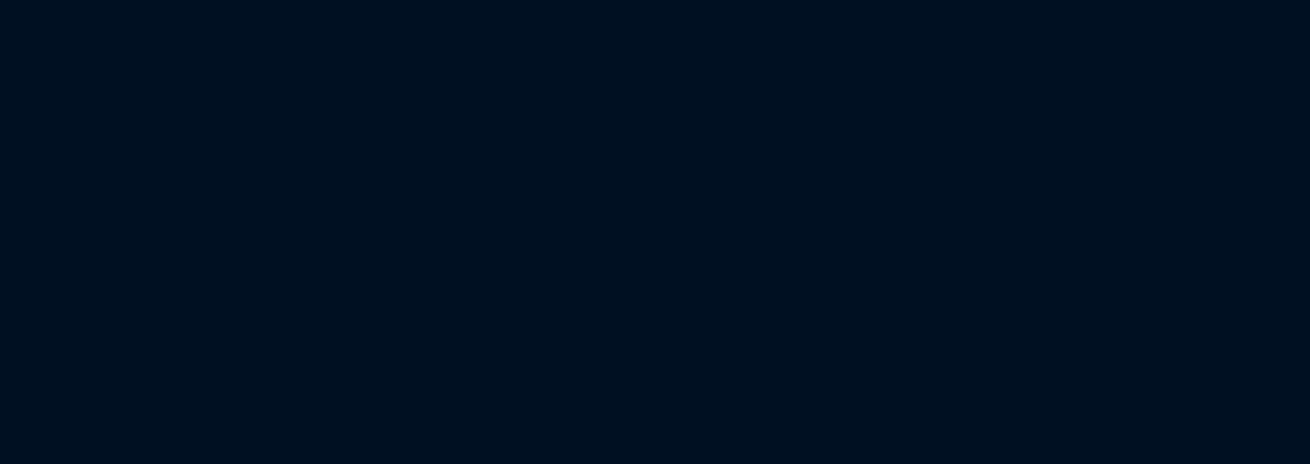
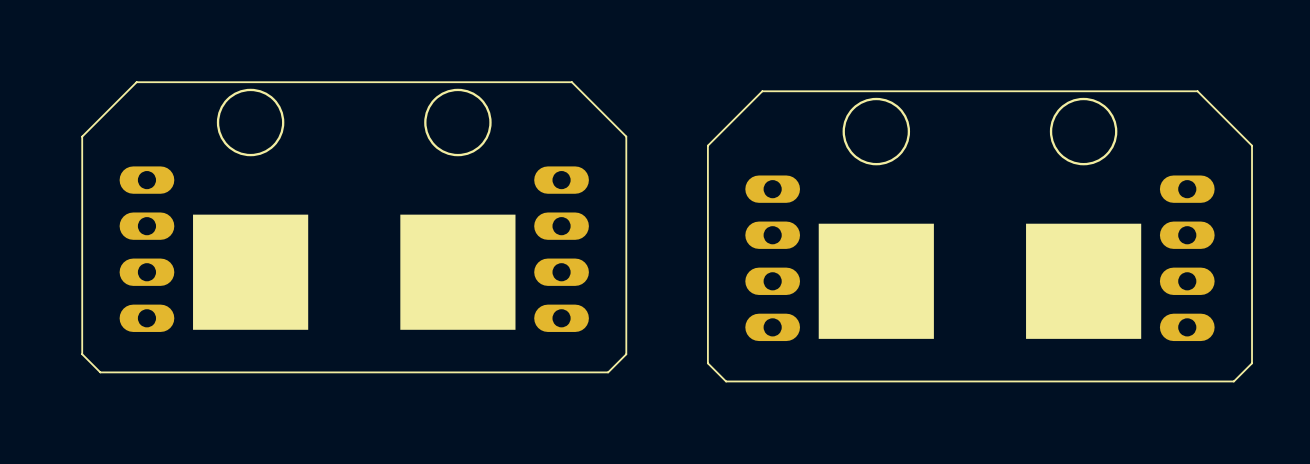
part: none -> (354, 227)
part: none -> (979, 236)

